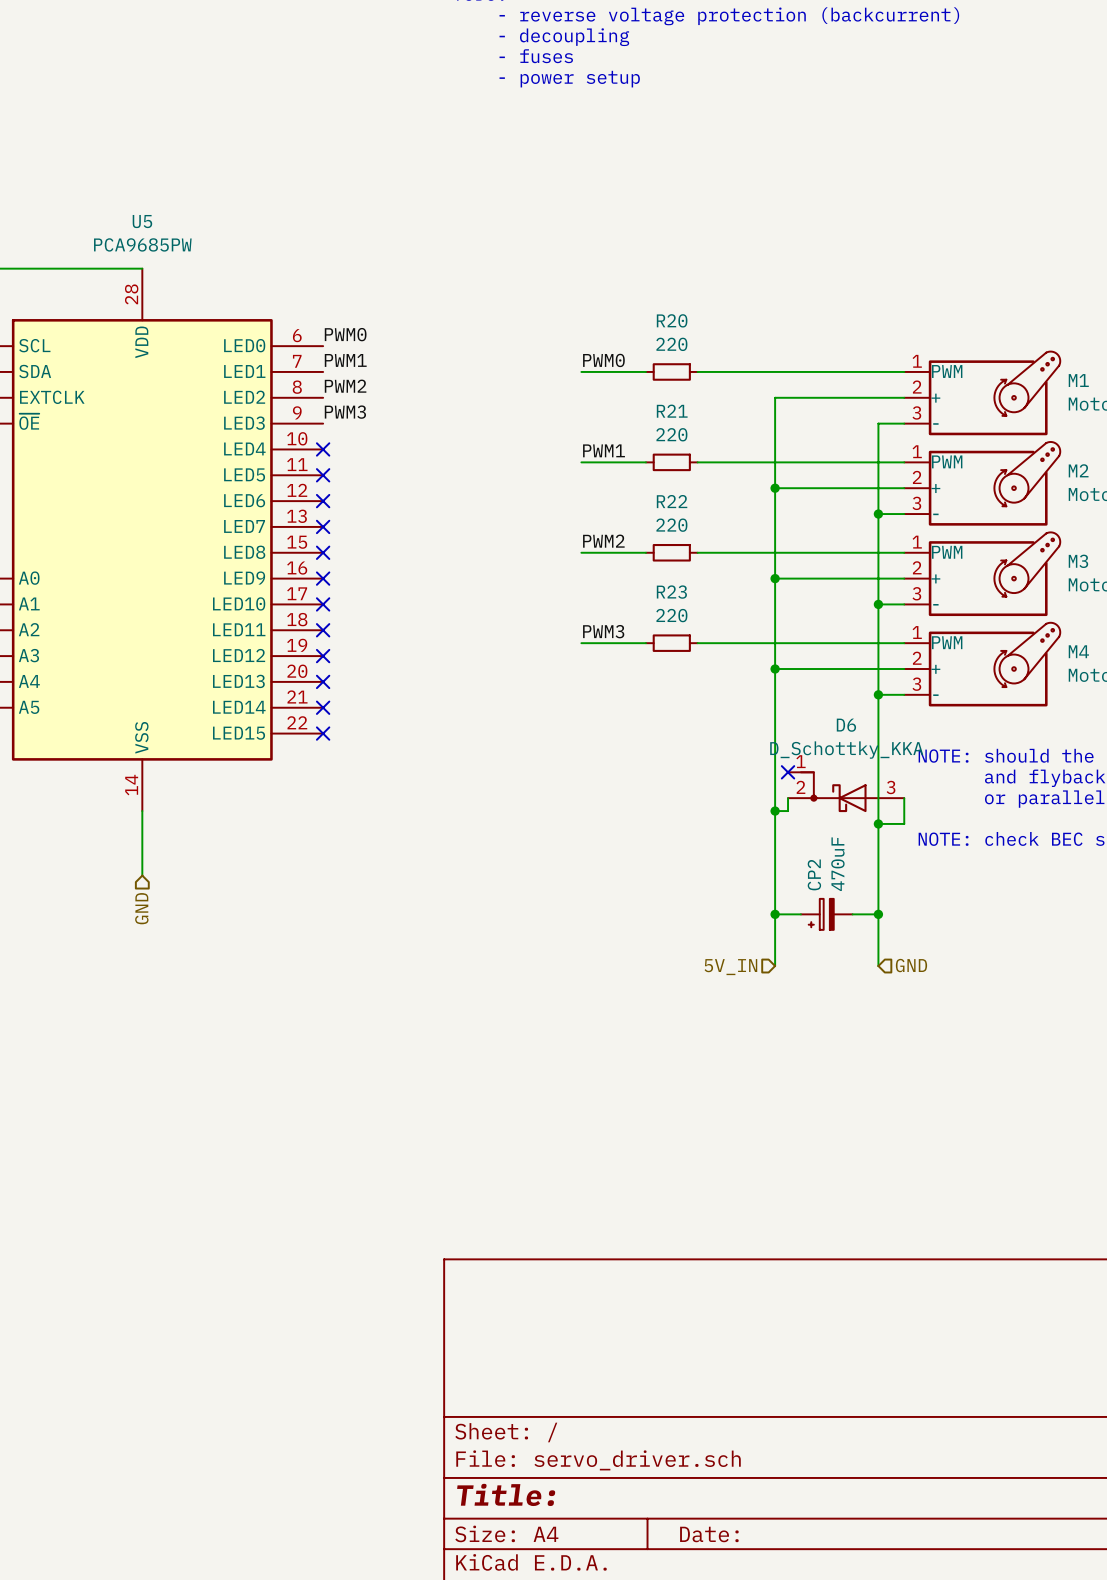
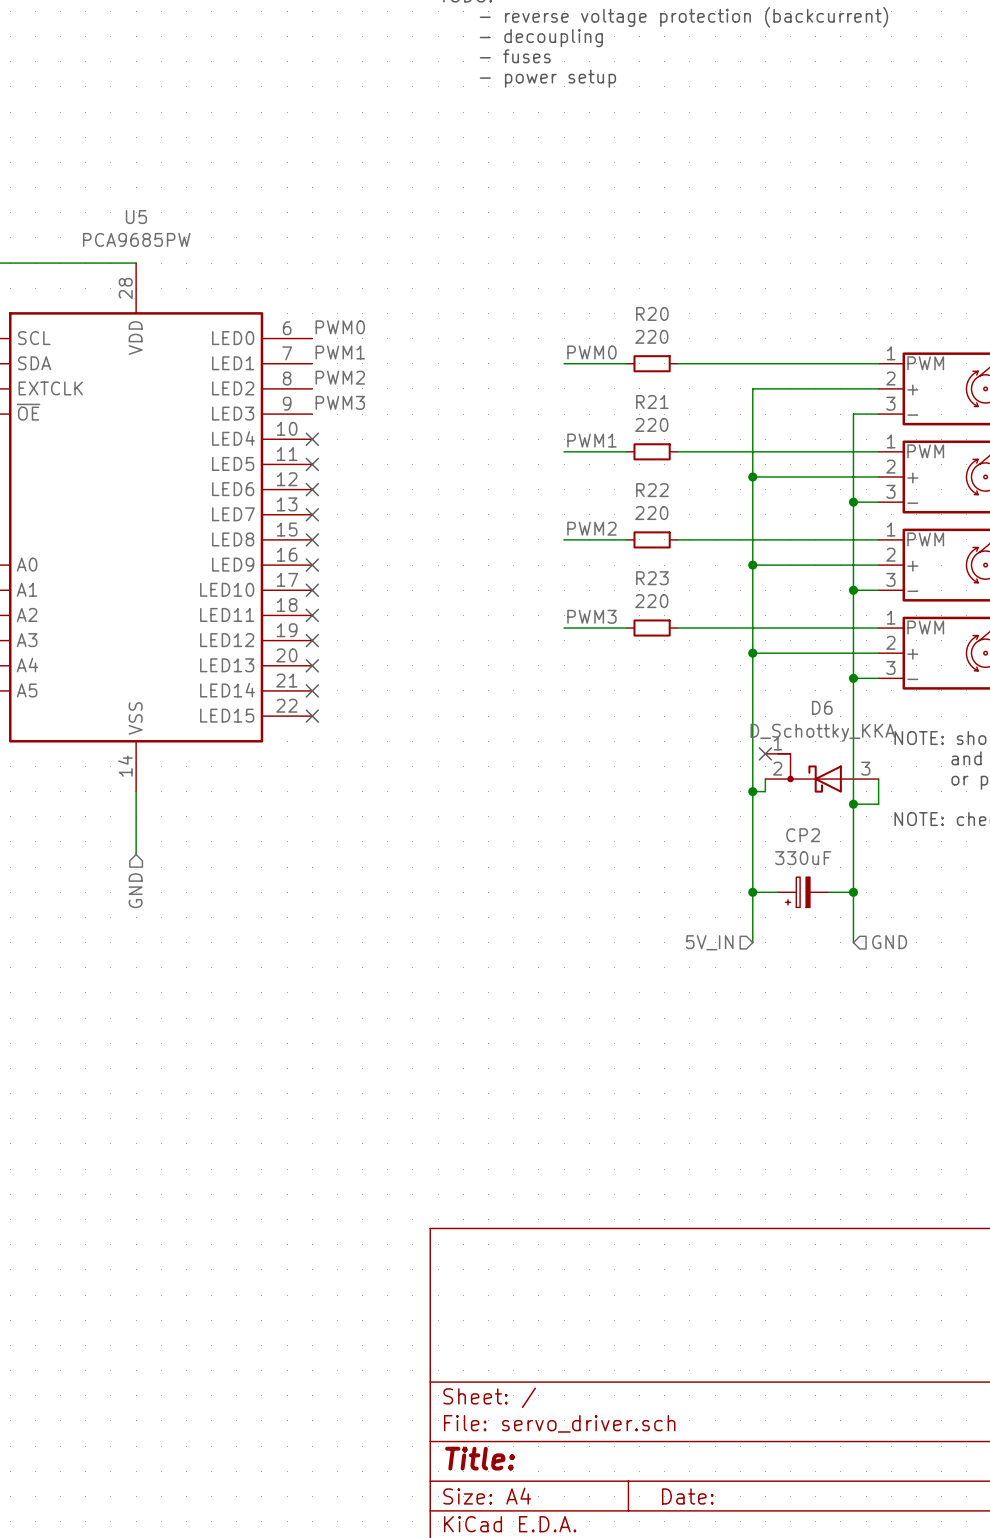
CP2 value: 470uF (837, 864) -> 330uF (803, 858)
CP2 name rotation: 0° (814, 874) -> 90° clockwise (803, 835)

